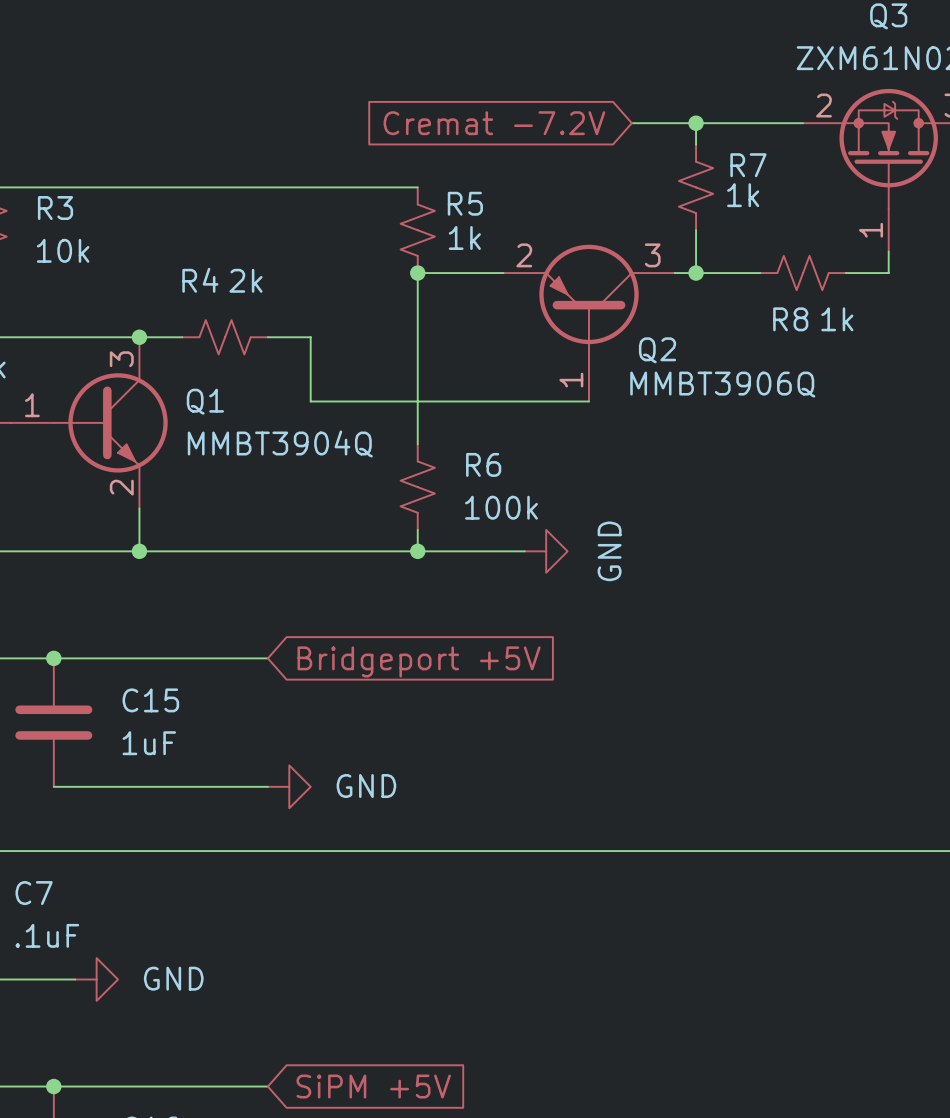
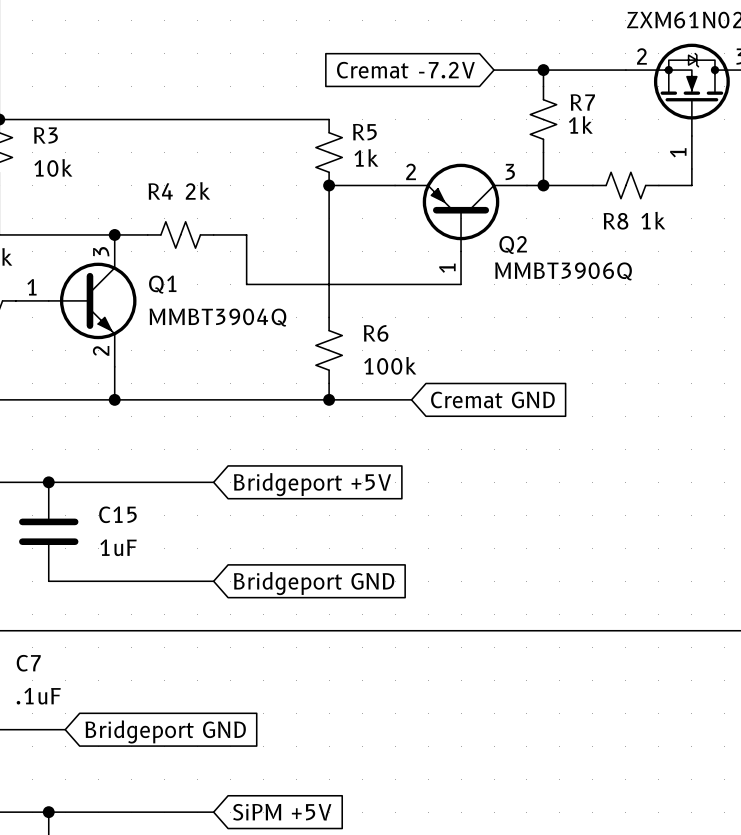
power symbol: GND (546, 551) -> none
global label: none -> Cremat GND (492, 399)
power symbol: GND (289, 786) -> none
global label: none -> Bridgeport GND (314, 583)
power symbol: GND (96, 979) -> none
global label: none -> Bridgeport GND (165, 731)

